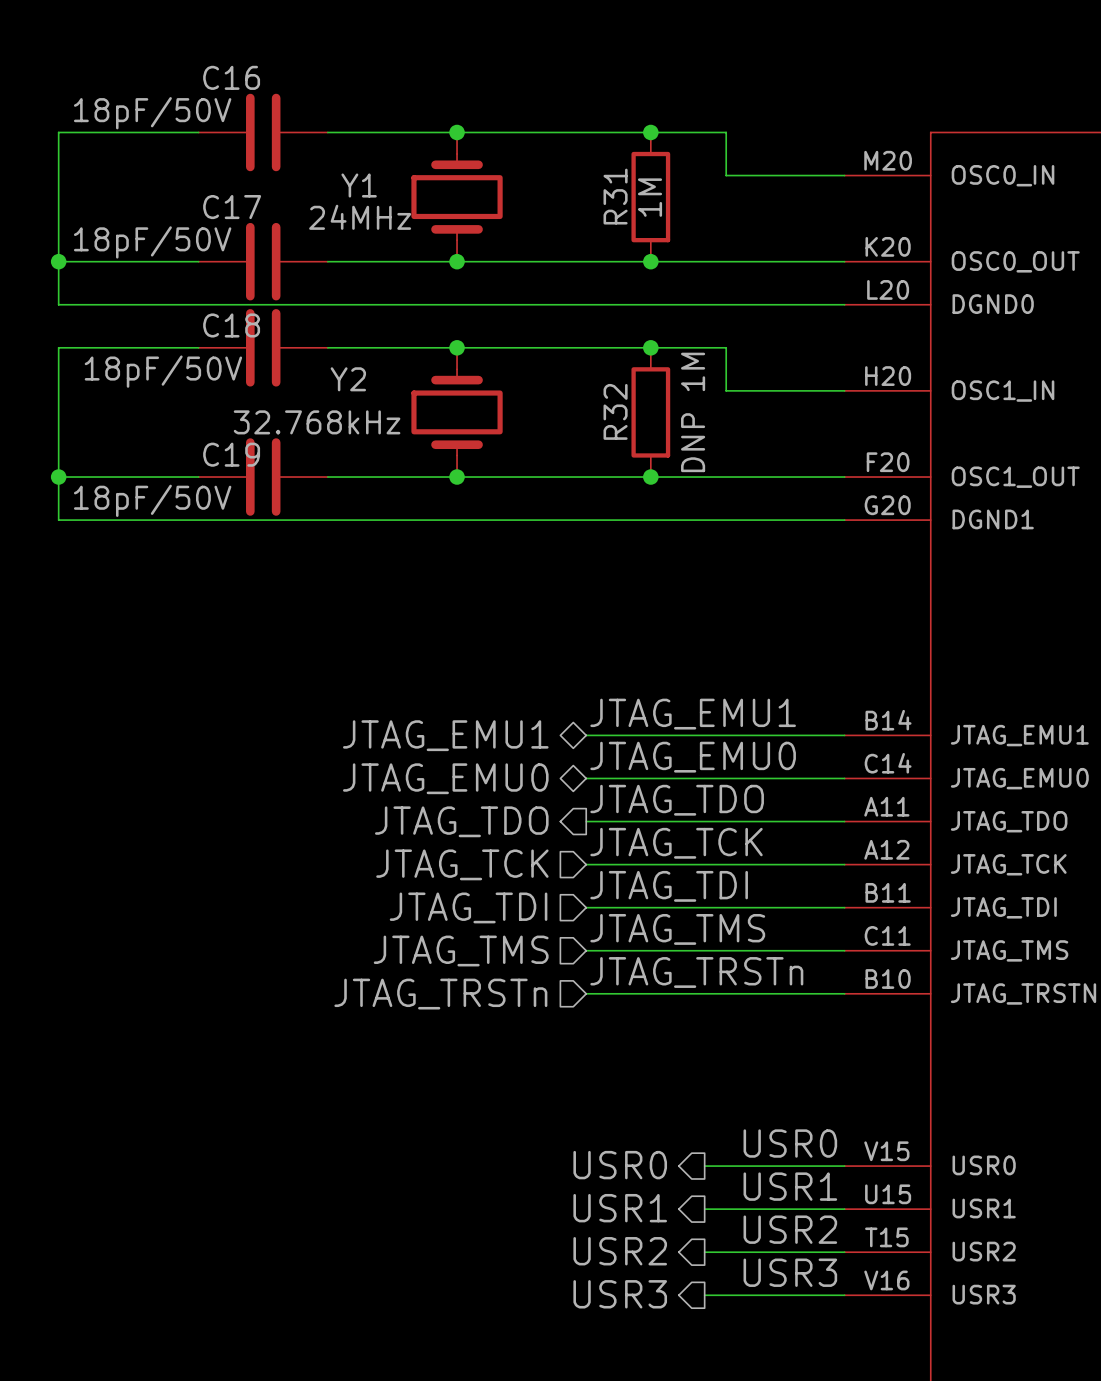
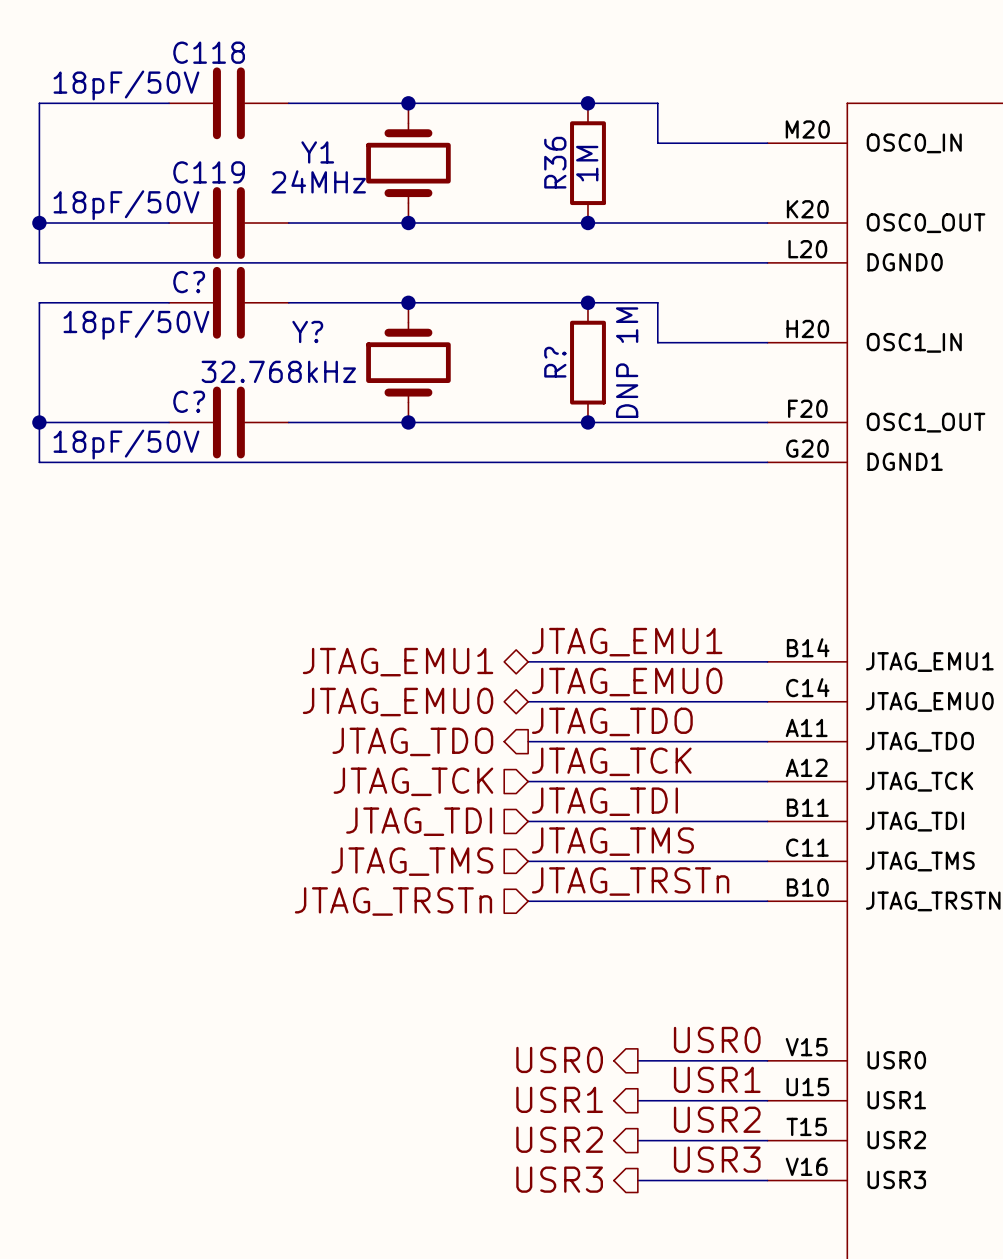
C16 name: C16 (231, 77) -> C118 (209, 52)
R31 name: R31 (615, 196) -> R36 (555, 162)
C17 name: C17 (232, 207) -> C119 (209, 172)
C18 name: C18 (231, 325) -> C? (189, 282)
Y2 name: Y2 (348, 379) -> Y? (307, 331)
R32 name: R32 (615, 411) -> R? (555, 362)
C19 name: C19 (231, 454) -> C? (189, 401)

